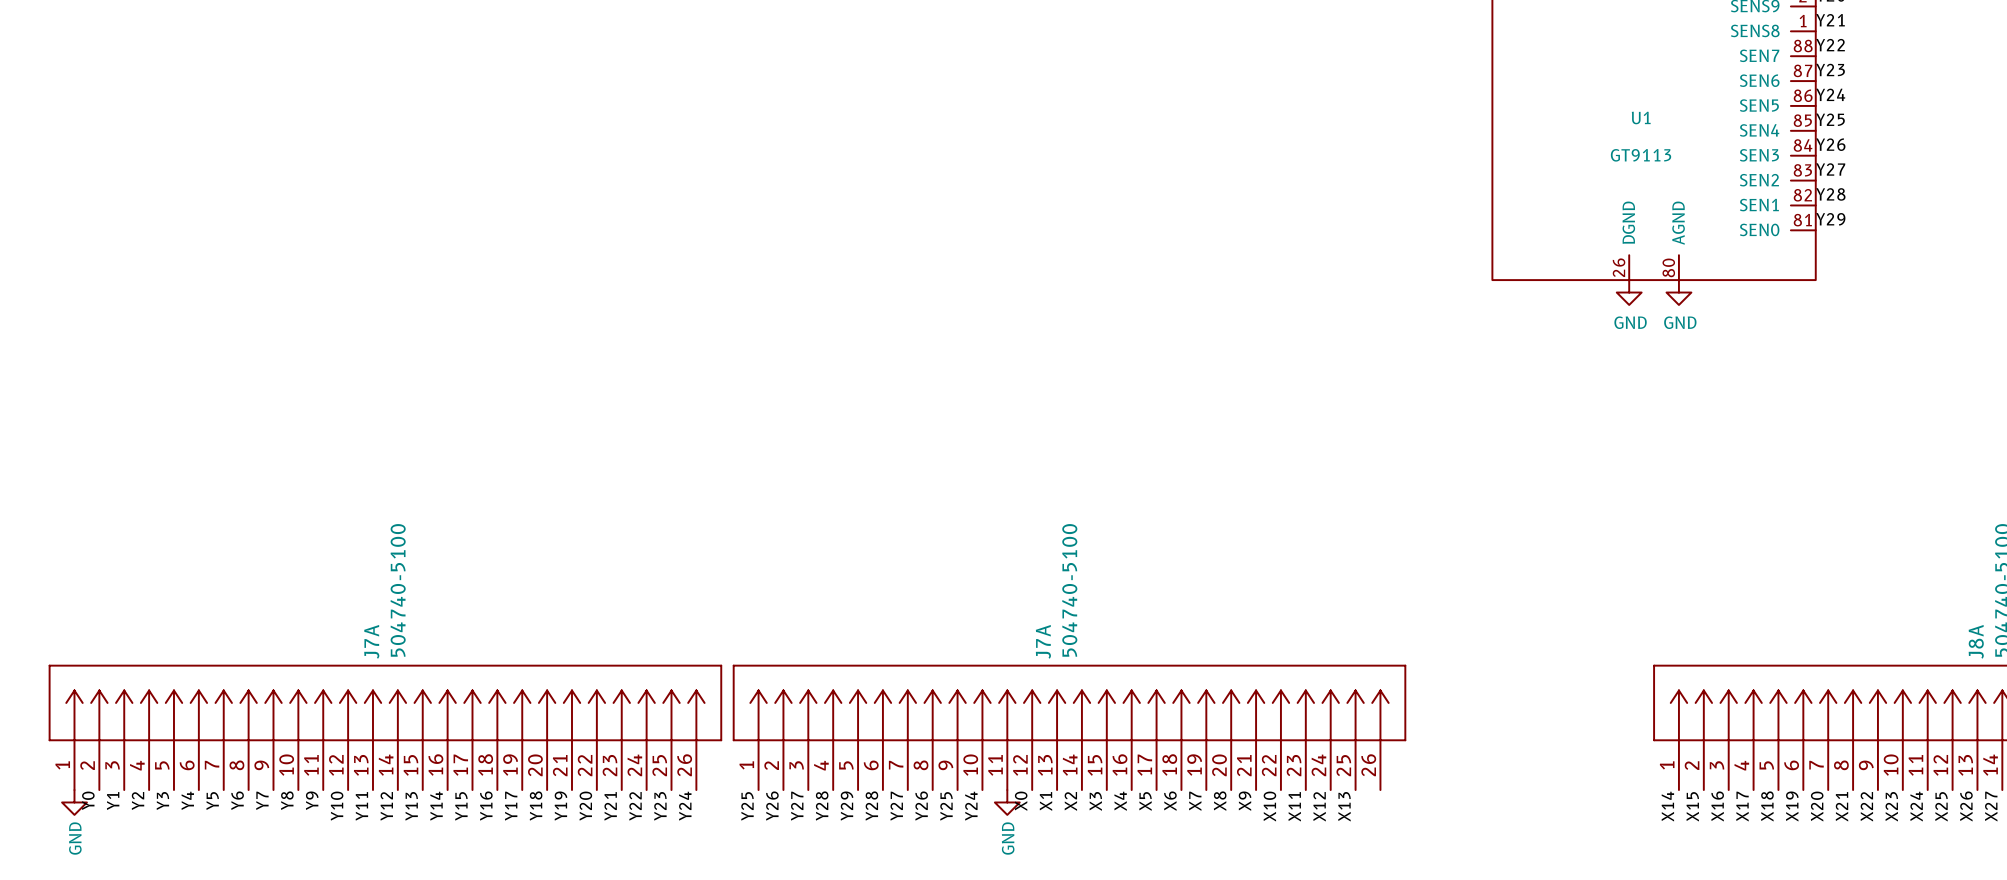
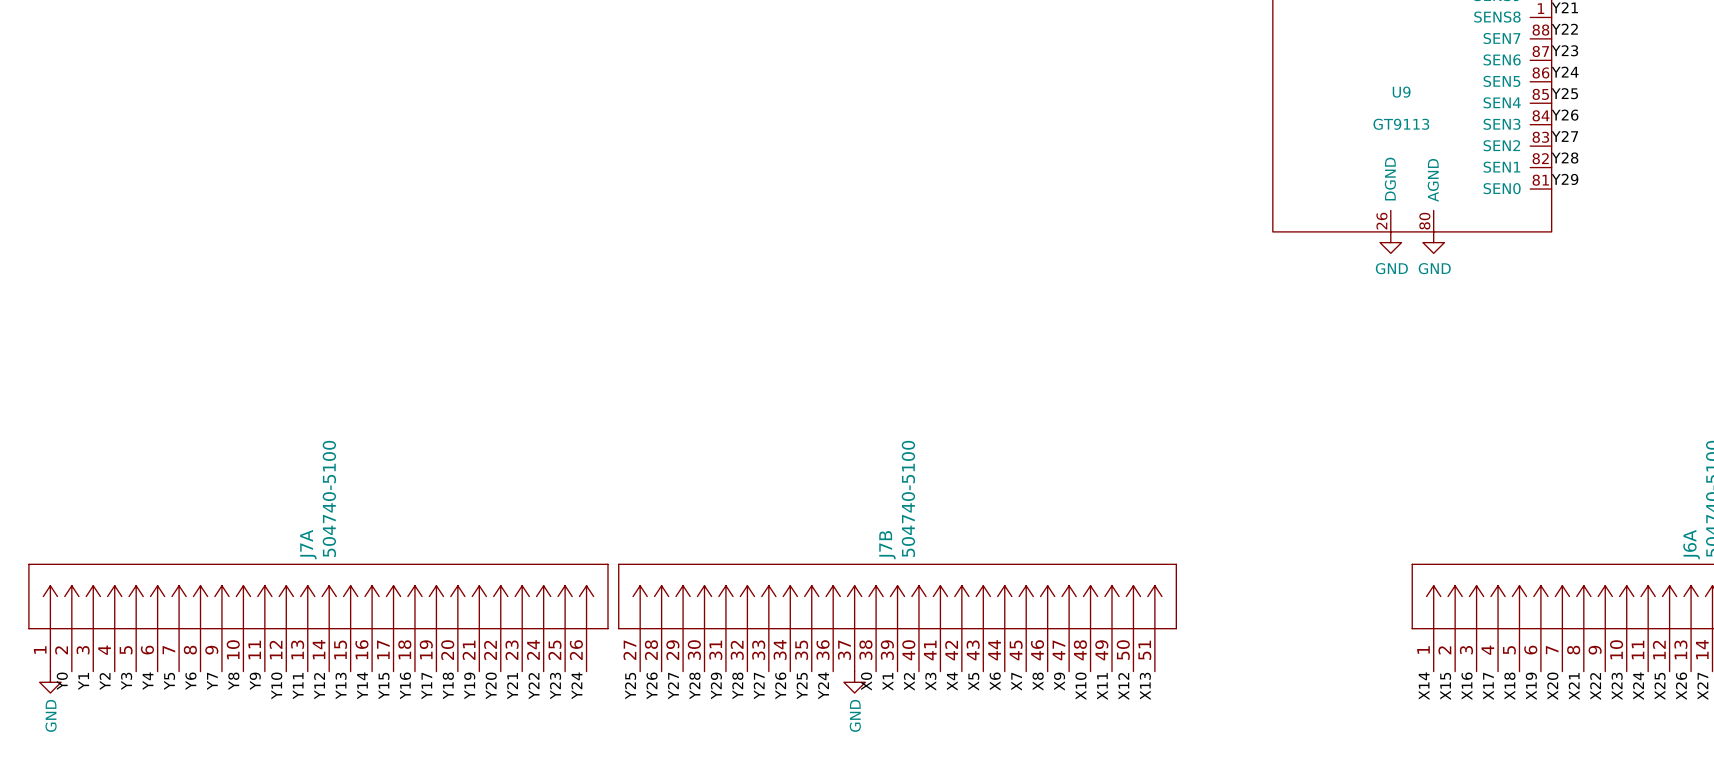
U1 name: U1 (1641, 117) -> U9 (1401, 92)
J8A name: J8A (1976, 641) -> J6A (1691, 544)
J7B: none -> 504740-5100 (897, 617)
J7A: 504740-5100 (1069, 727) -> none

